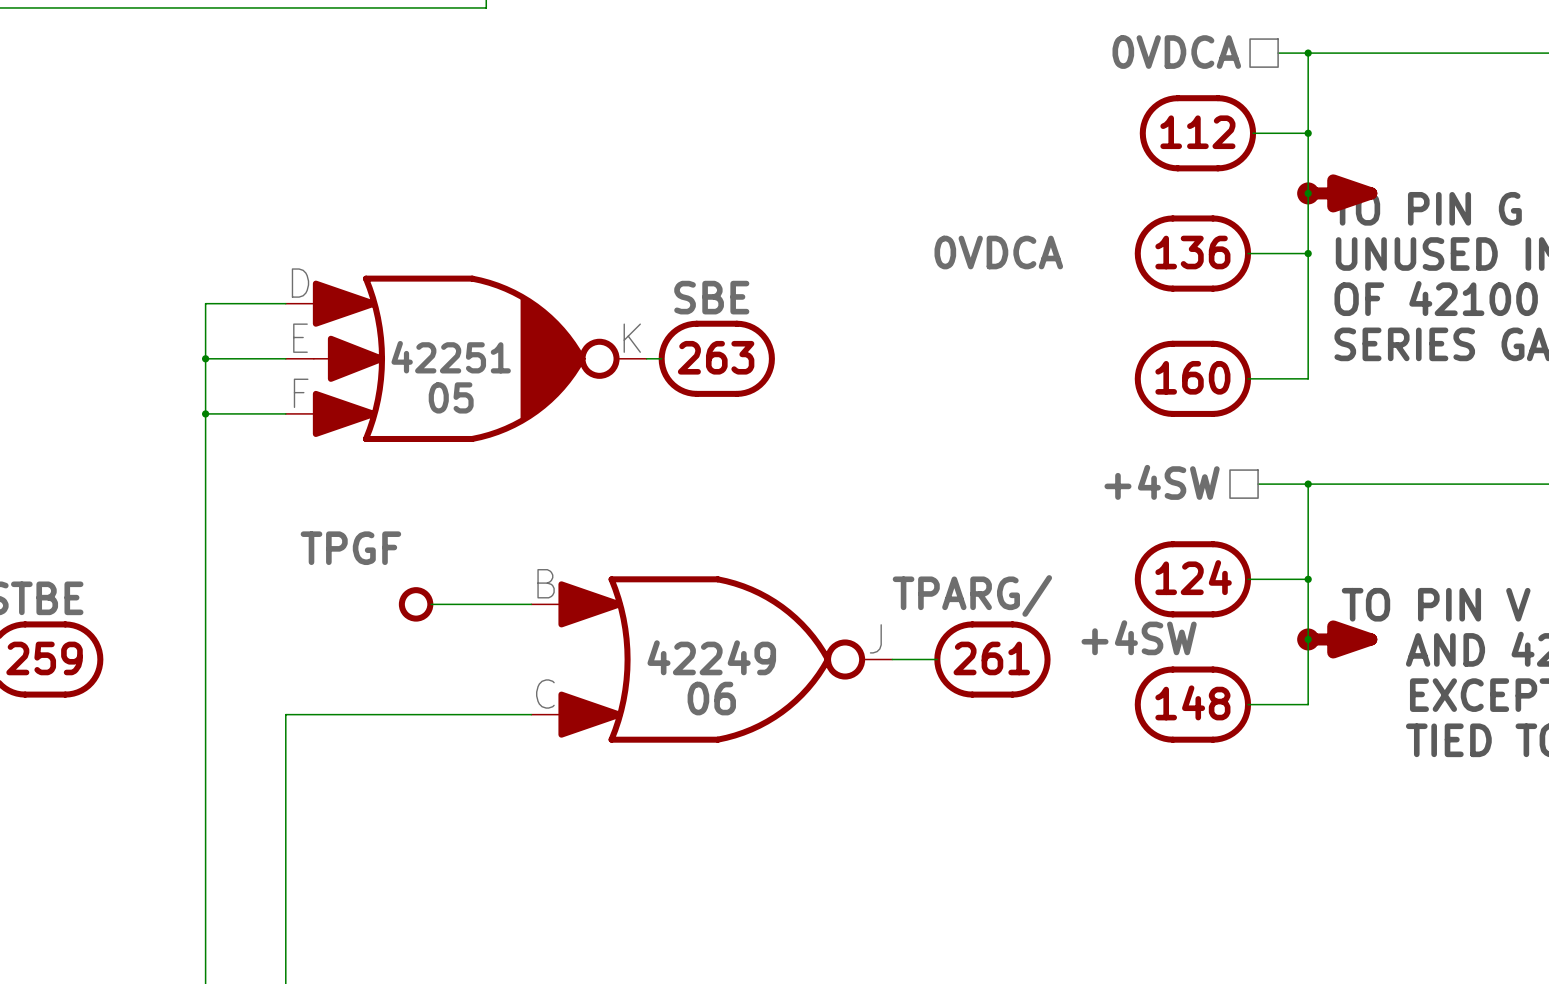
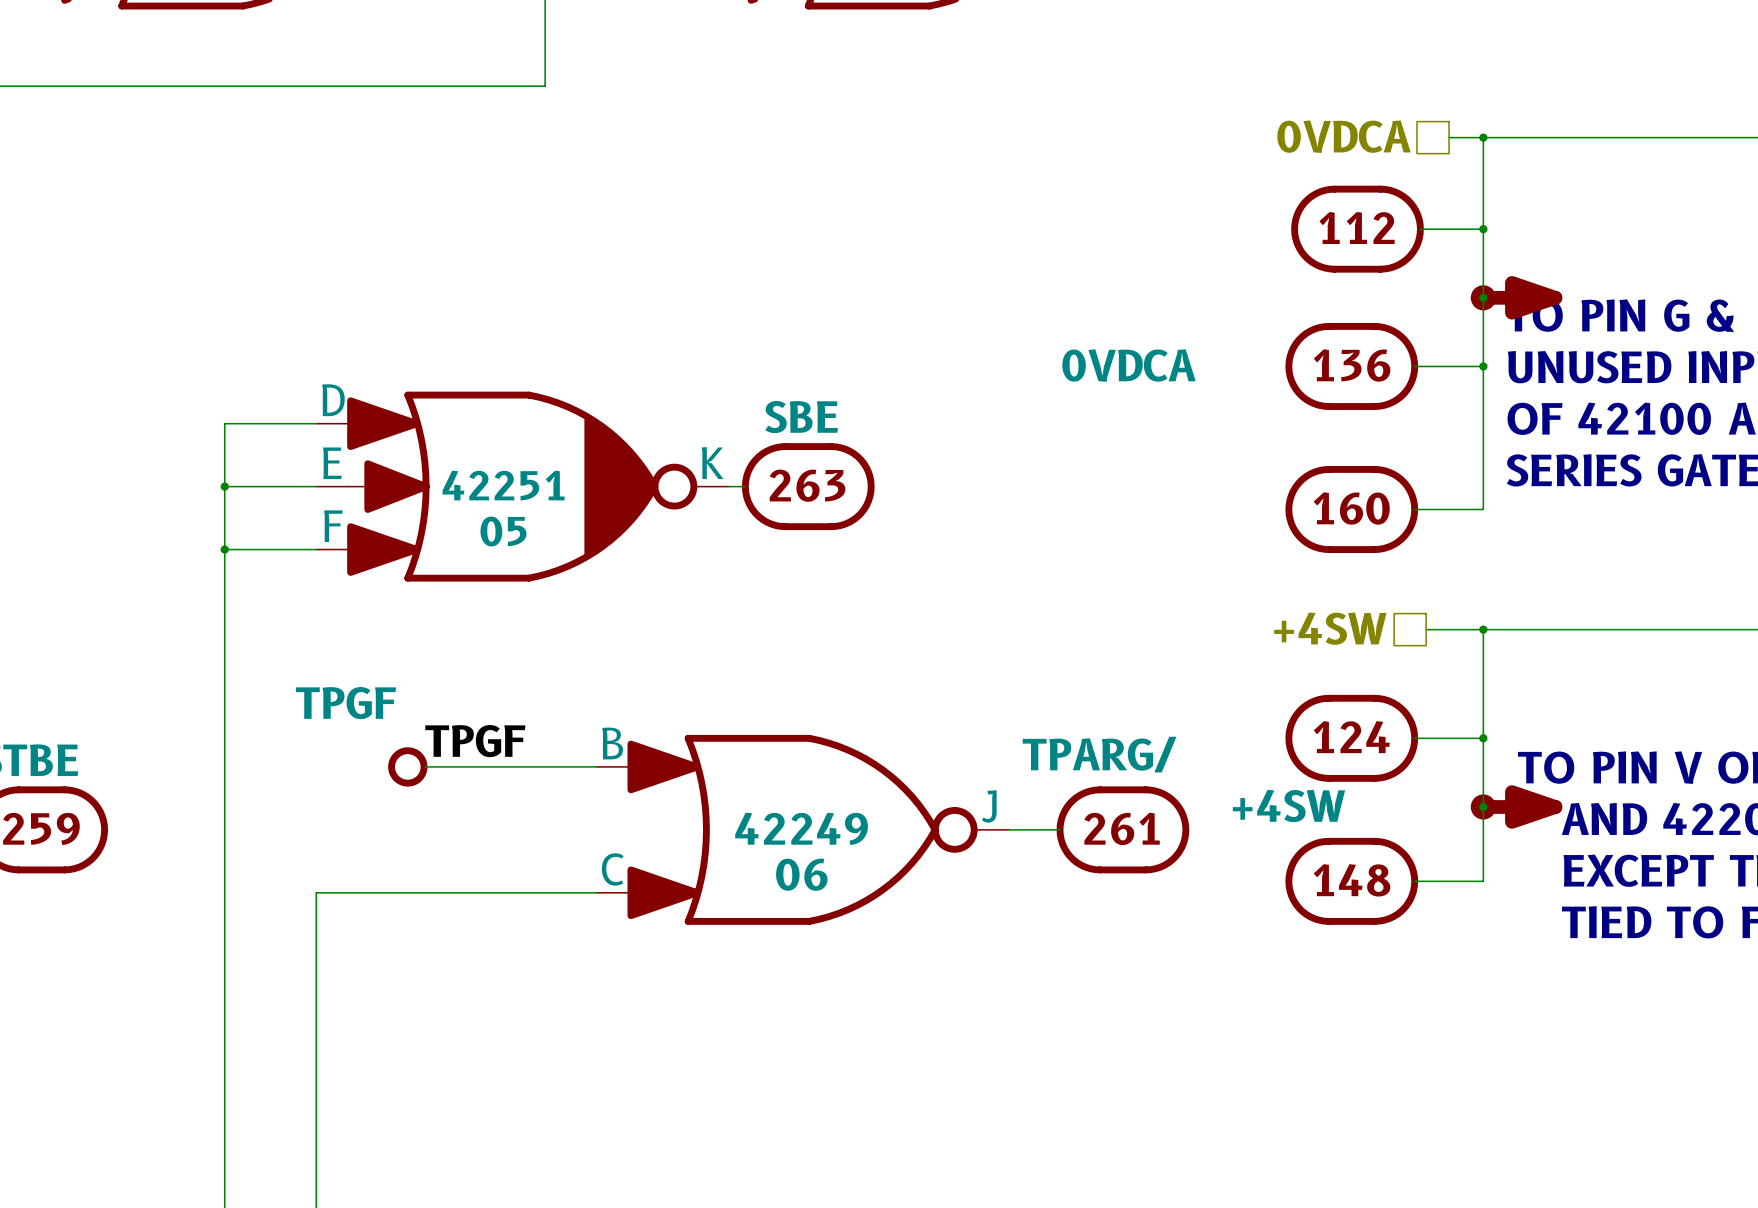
label: none -> TPGF (475, 741)
wire: none -> (424, 766) (482, 766)
part position: (416, 604) -> (407, 766)

